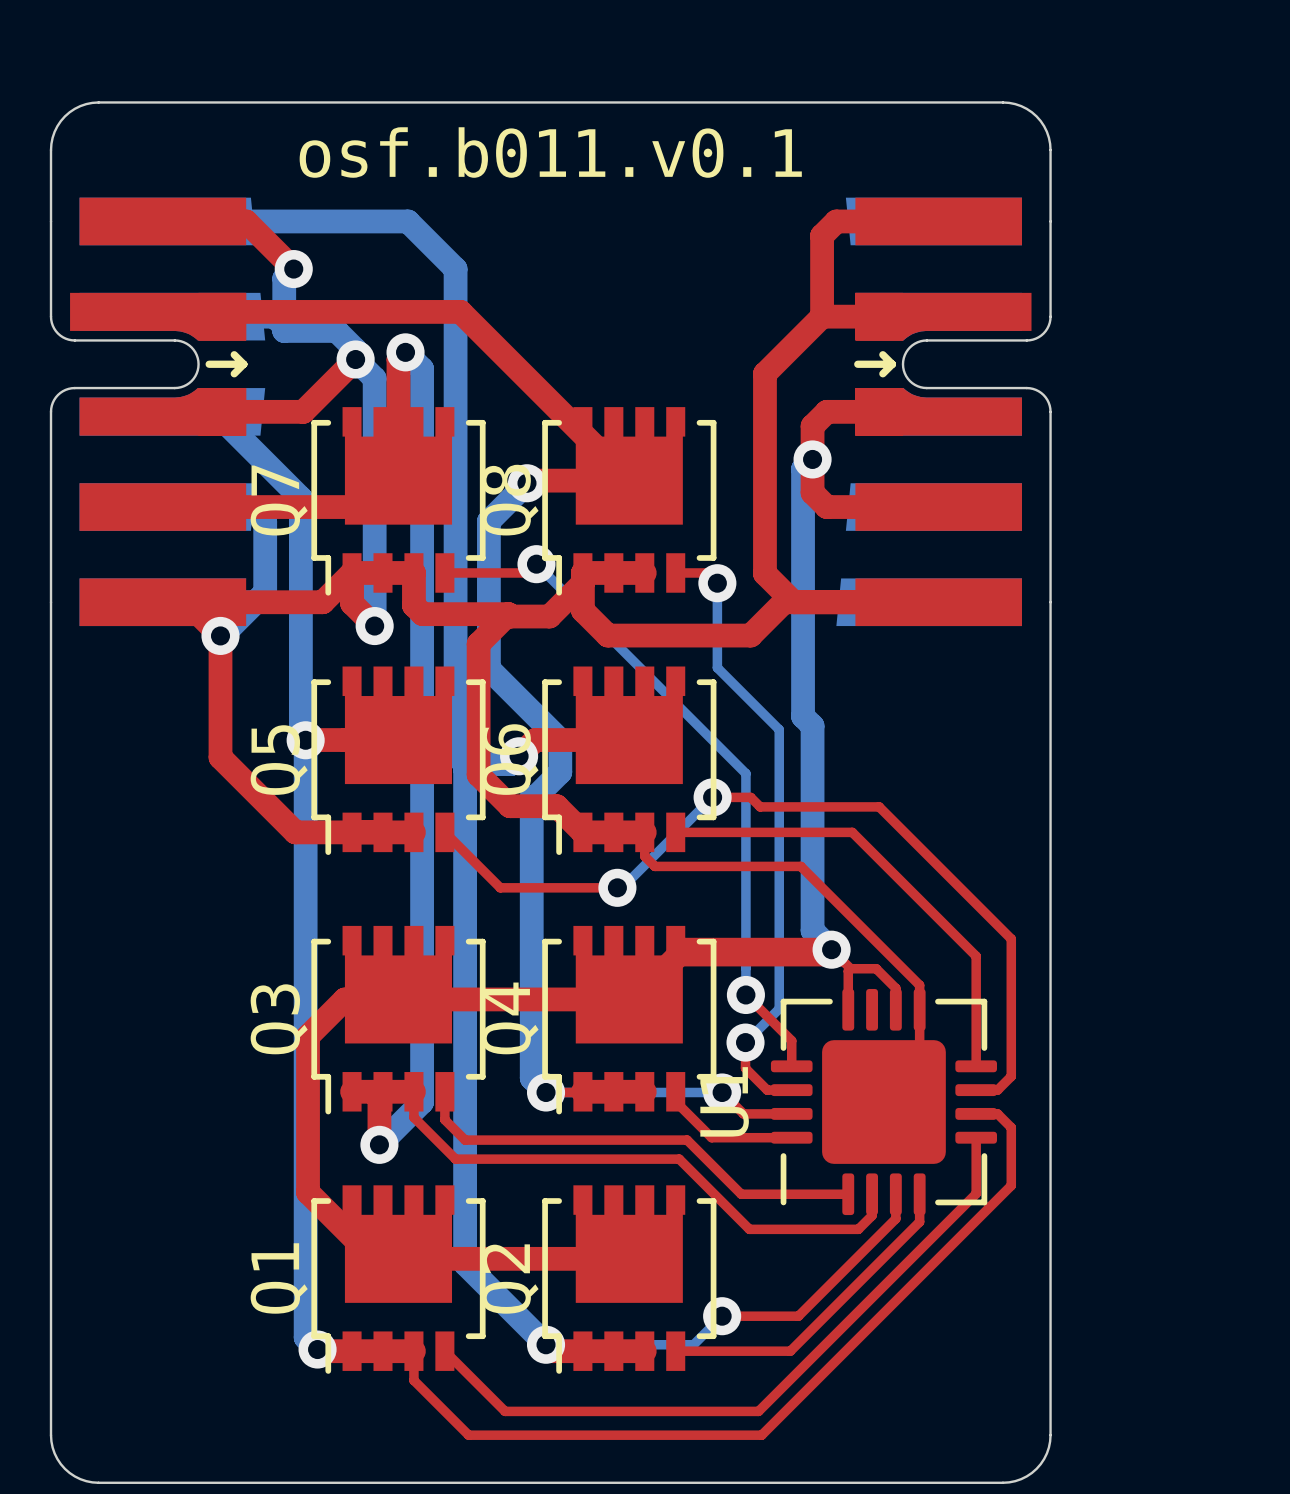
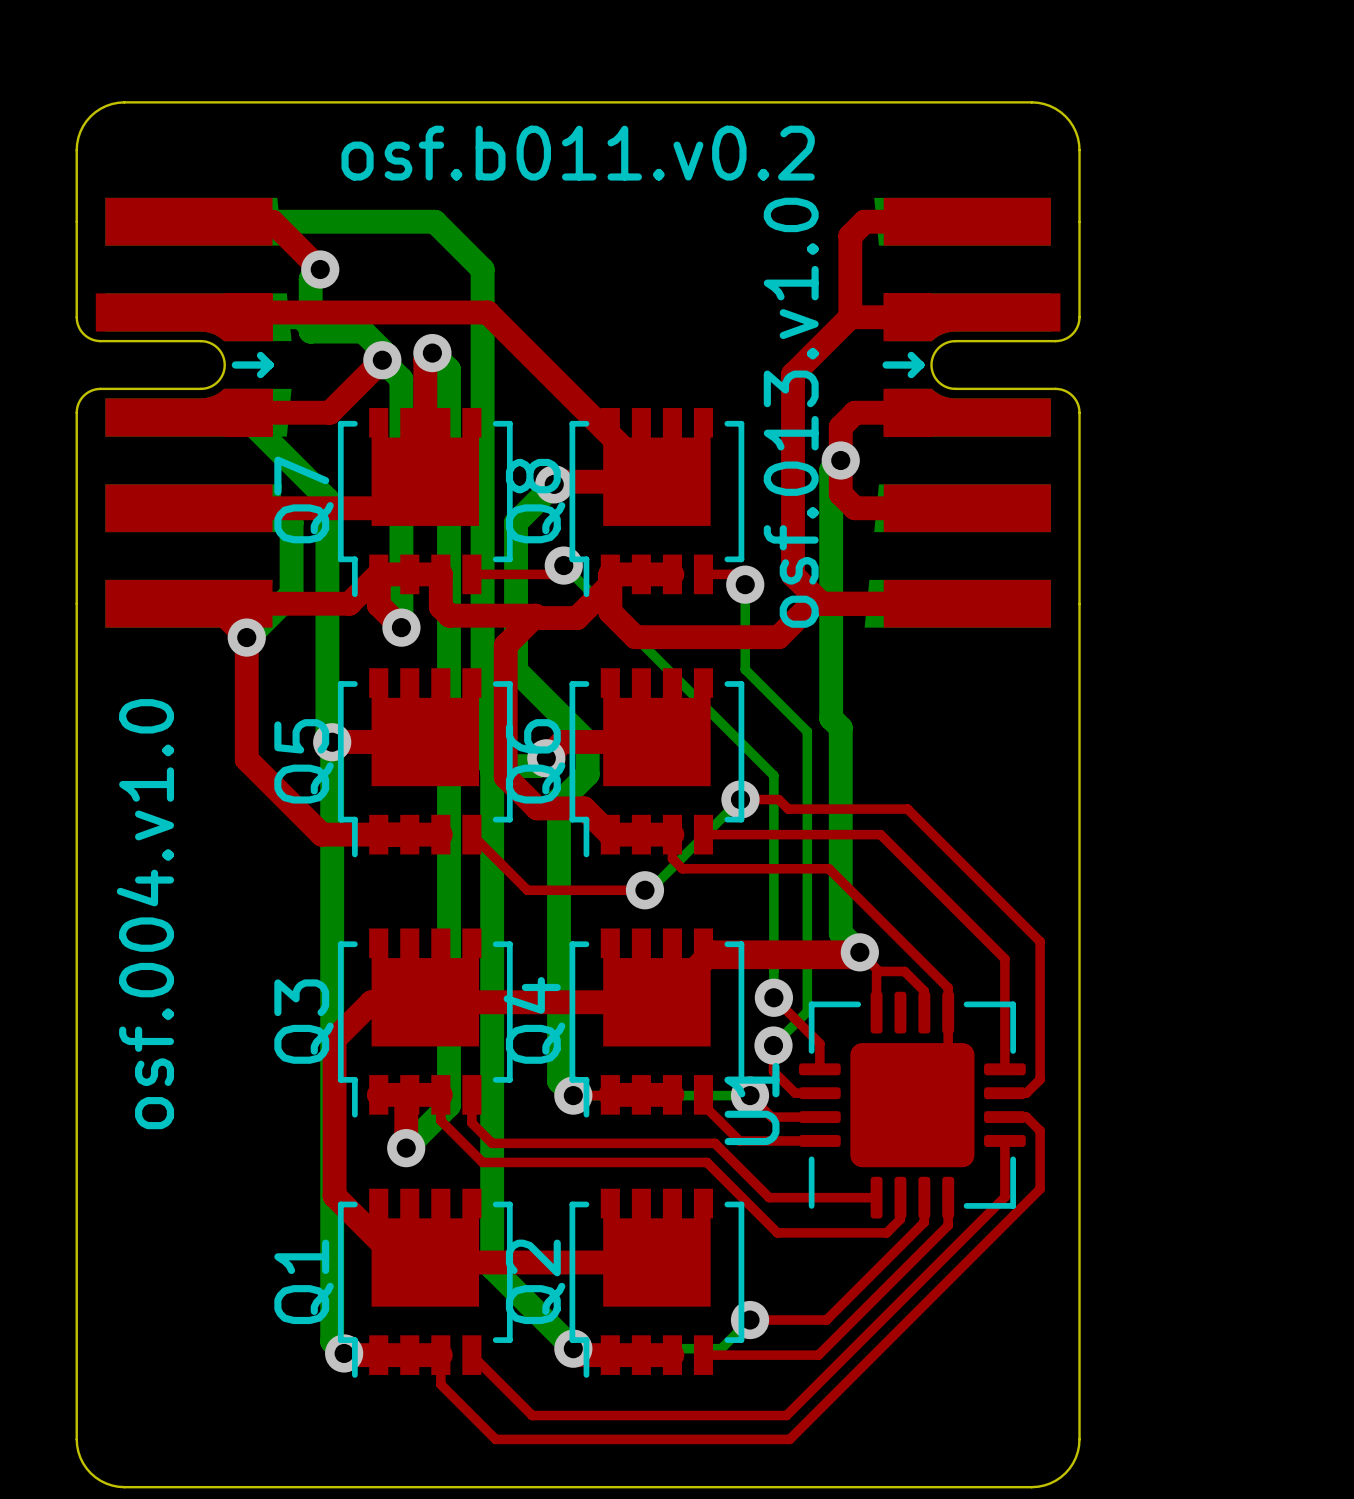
text: osf.b011.v0.1 (550, 152) -> osf.b011.v0.2 (578, 153)
text: none -> osf.013.v1.0 (791, 412)
text: none -> osf.004.v1.0 (145, 914)

